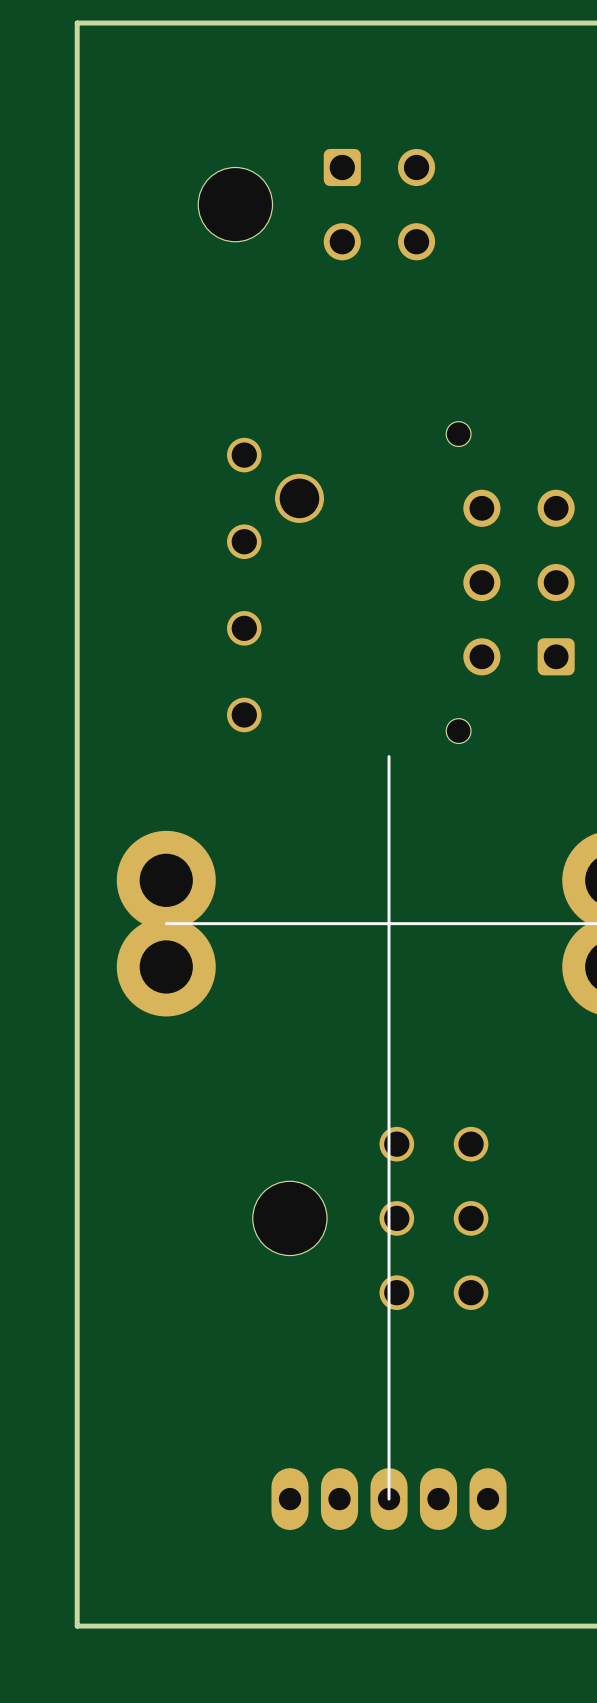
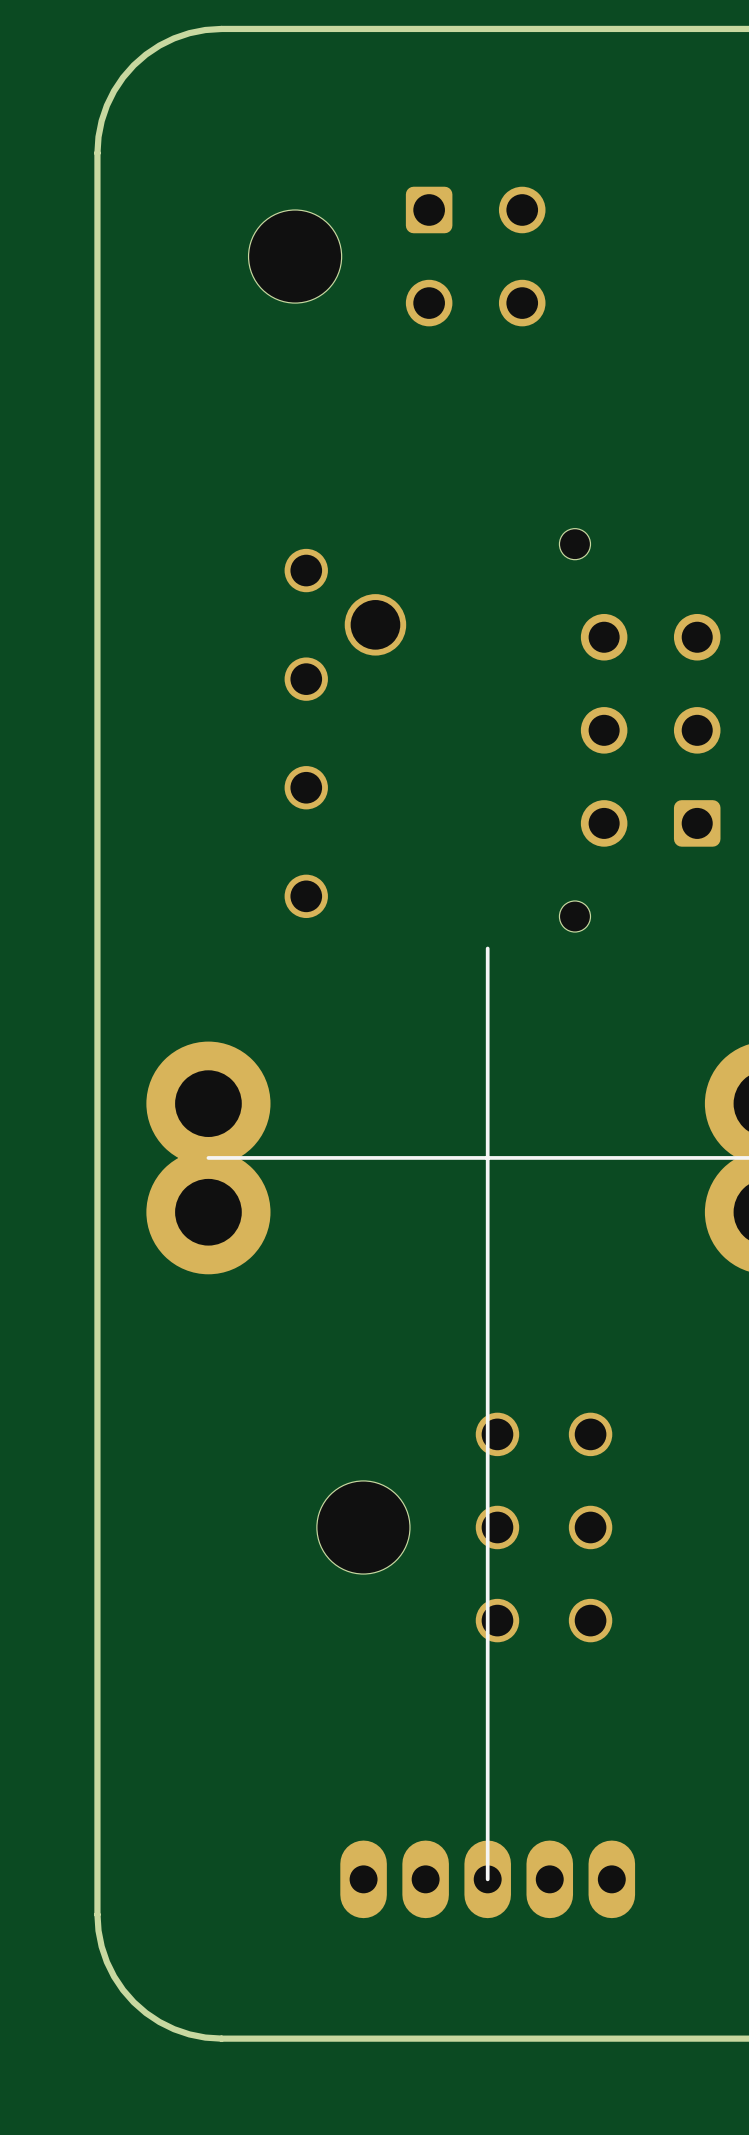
board edge: (176, 23) (77, 23) (77, 1626) (176, 1626) -> (221, 28) (189, 33) (174, 38) (146, 54) (123, 77) (114, 90) (106, 105) (98, 136) (97, 1914) (101, 1946) (106, 1962) (114, 1976) (133, 2002) (159, 2022) (174, 2029) (189, 2034) (221, 2038)

